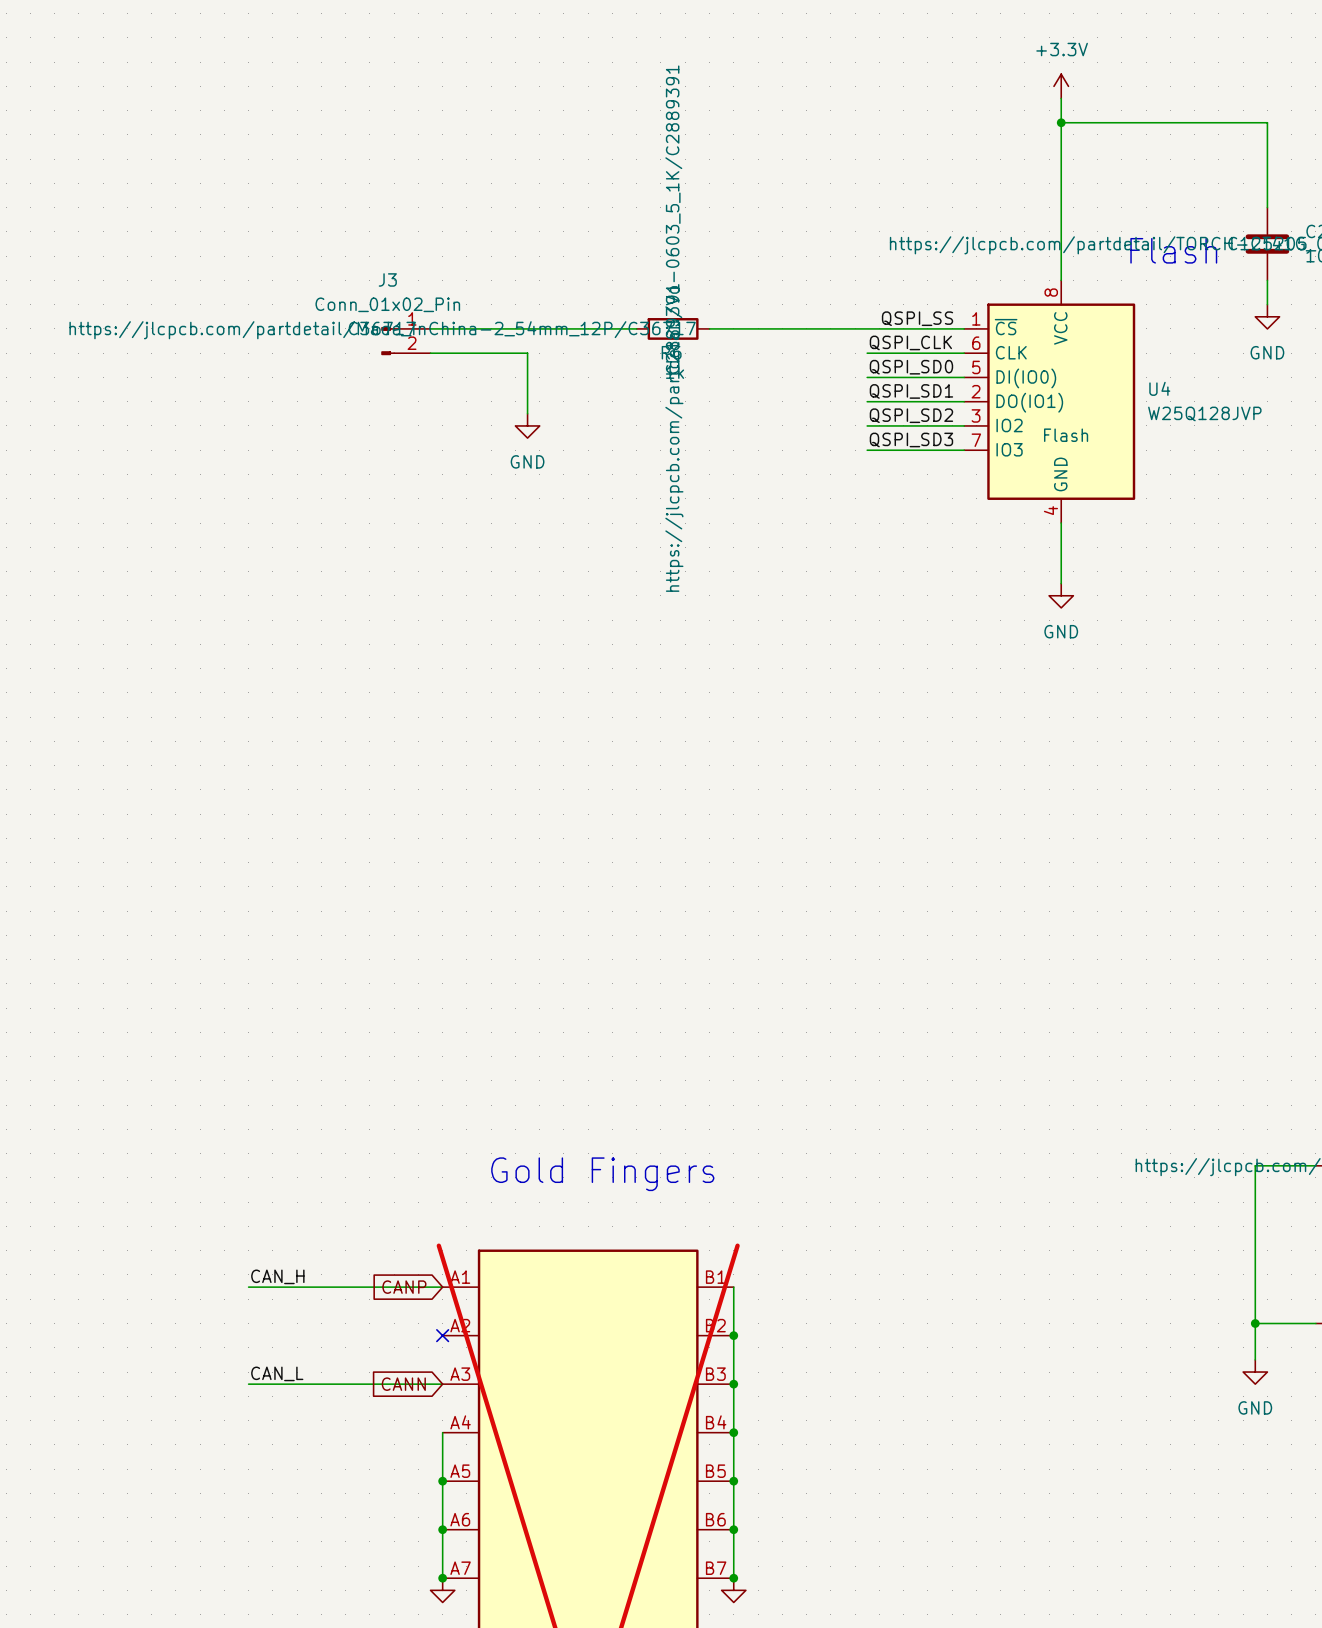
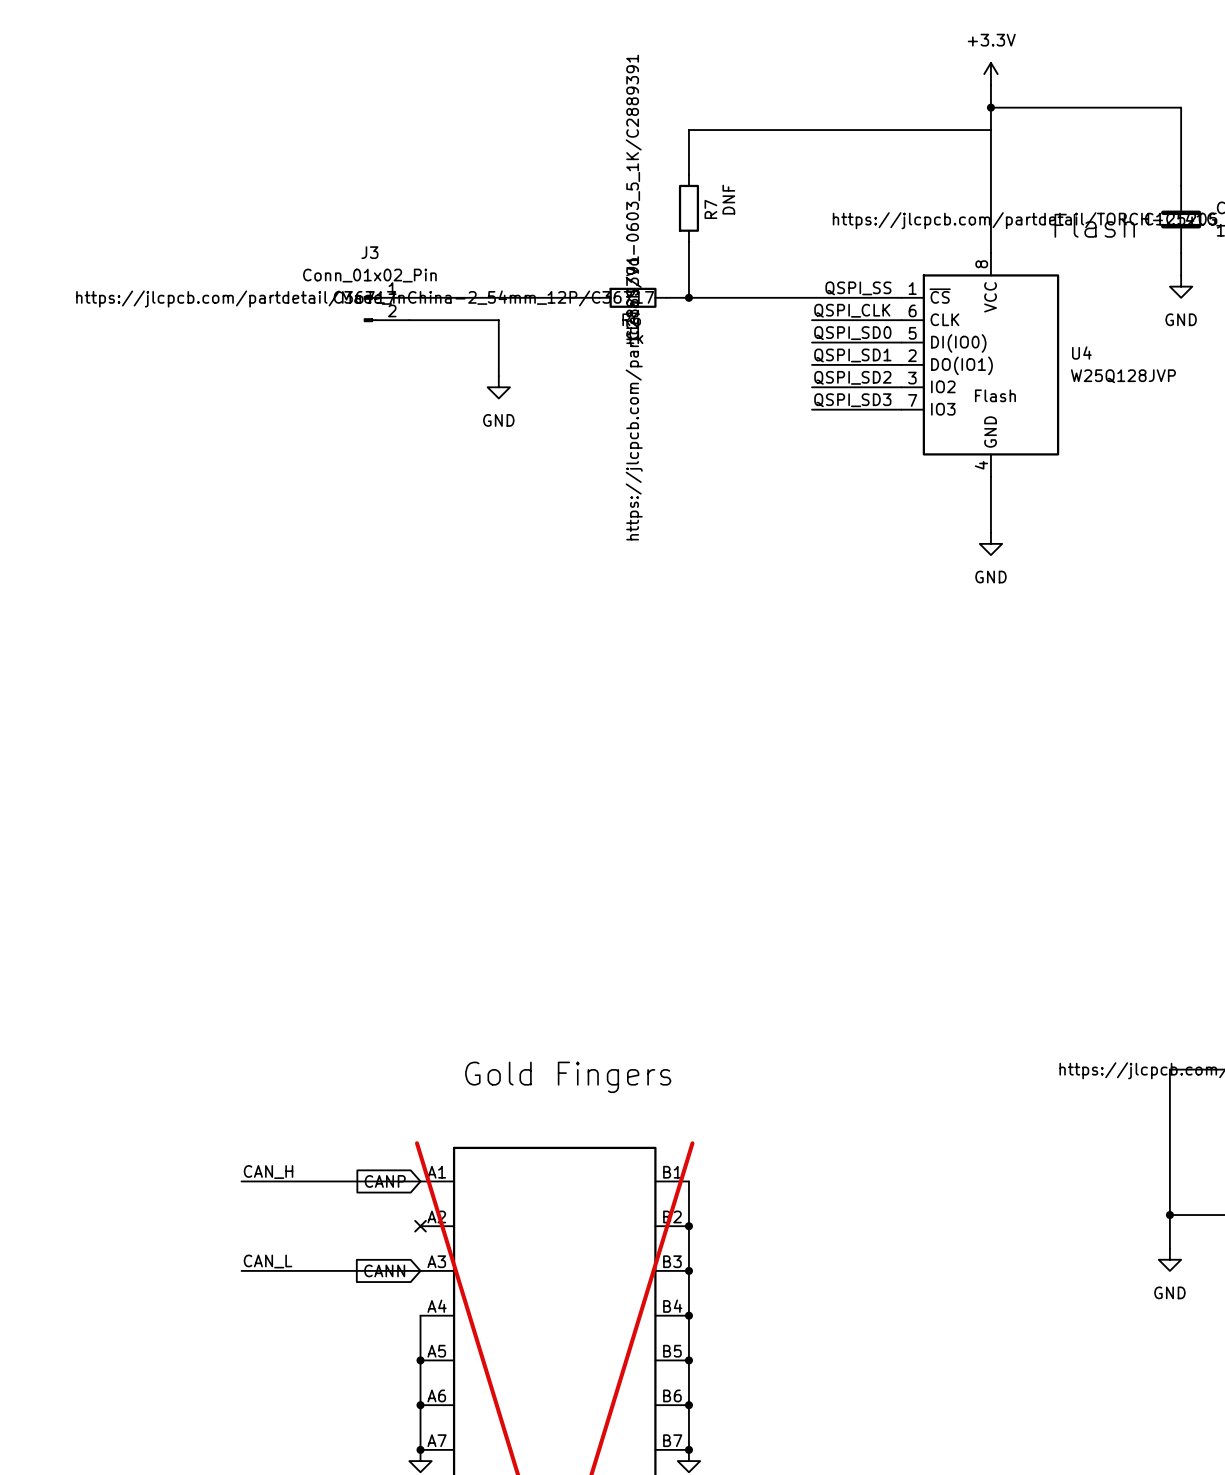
wire: none -> (990, 130) (688, 130) (688, 174)
R7: none -> DNF (688, 208)
wire: none -> (688, 241) (688, 297)
junction: none -> (688, 297)

